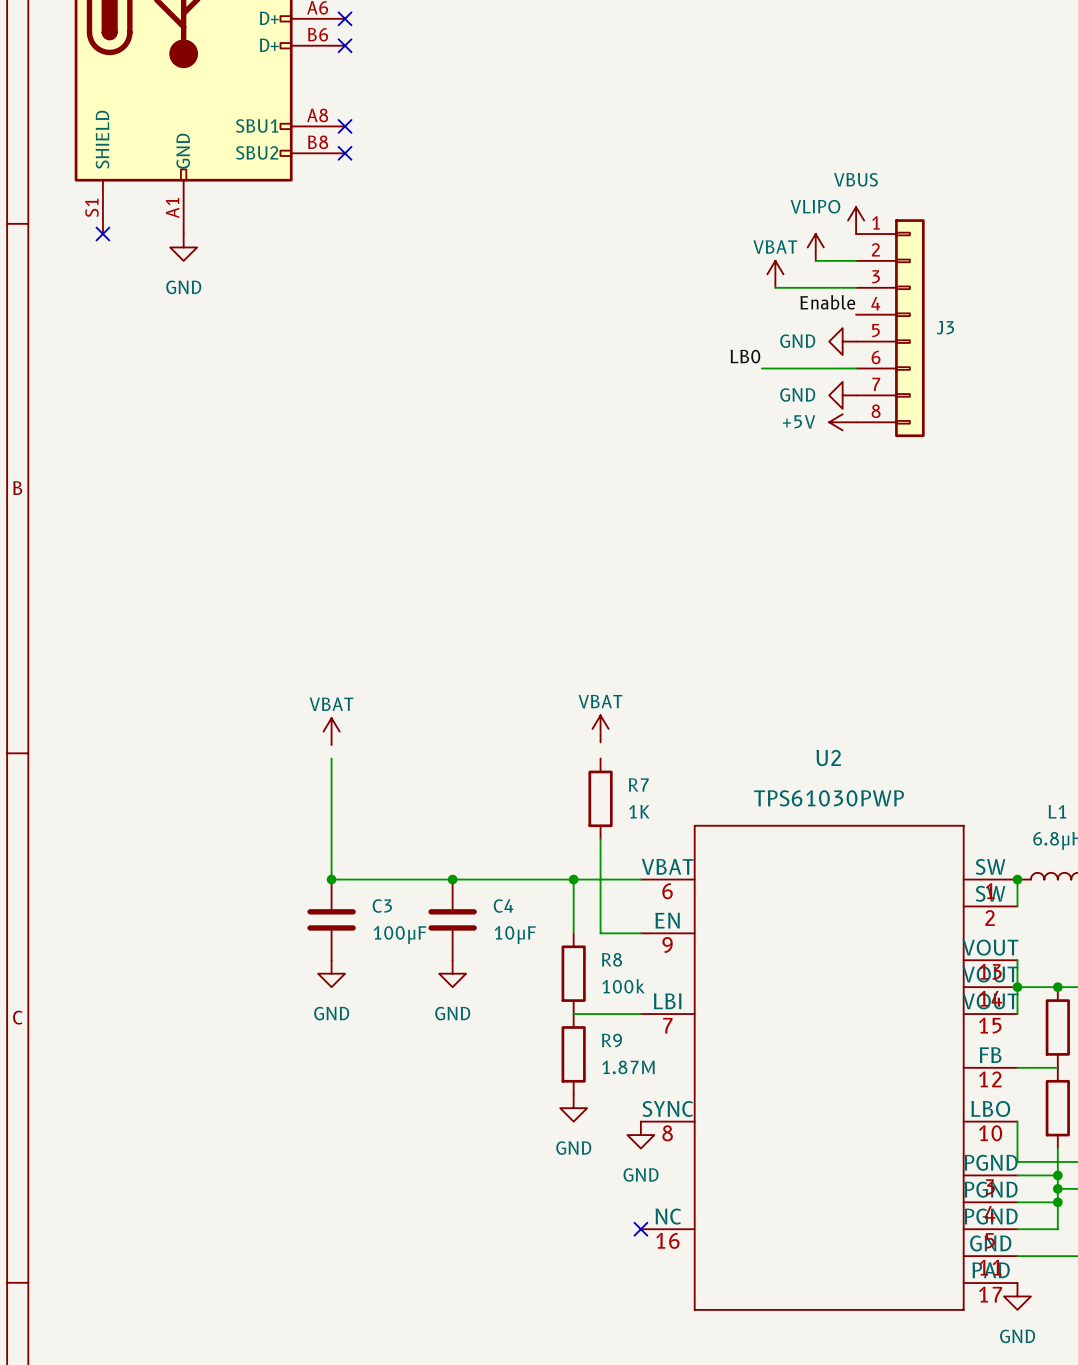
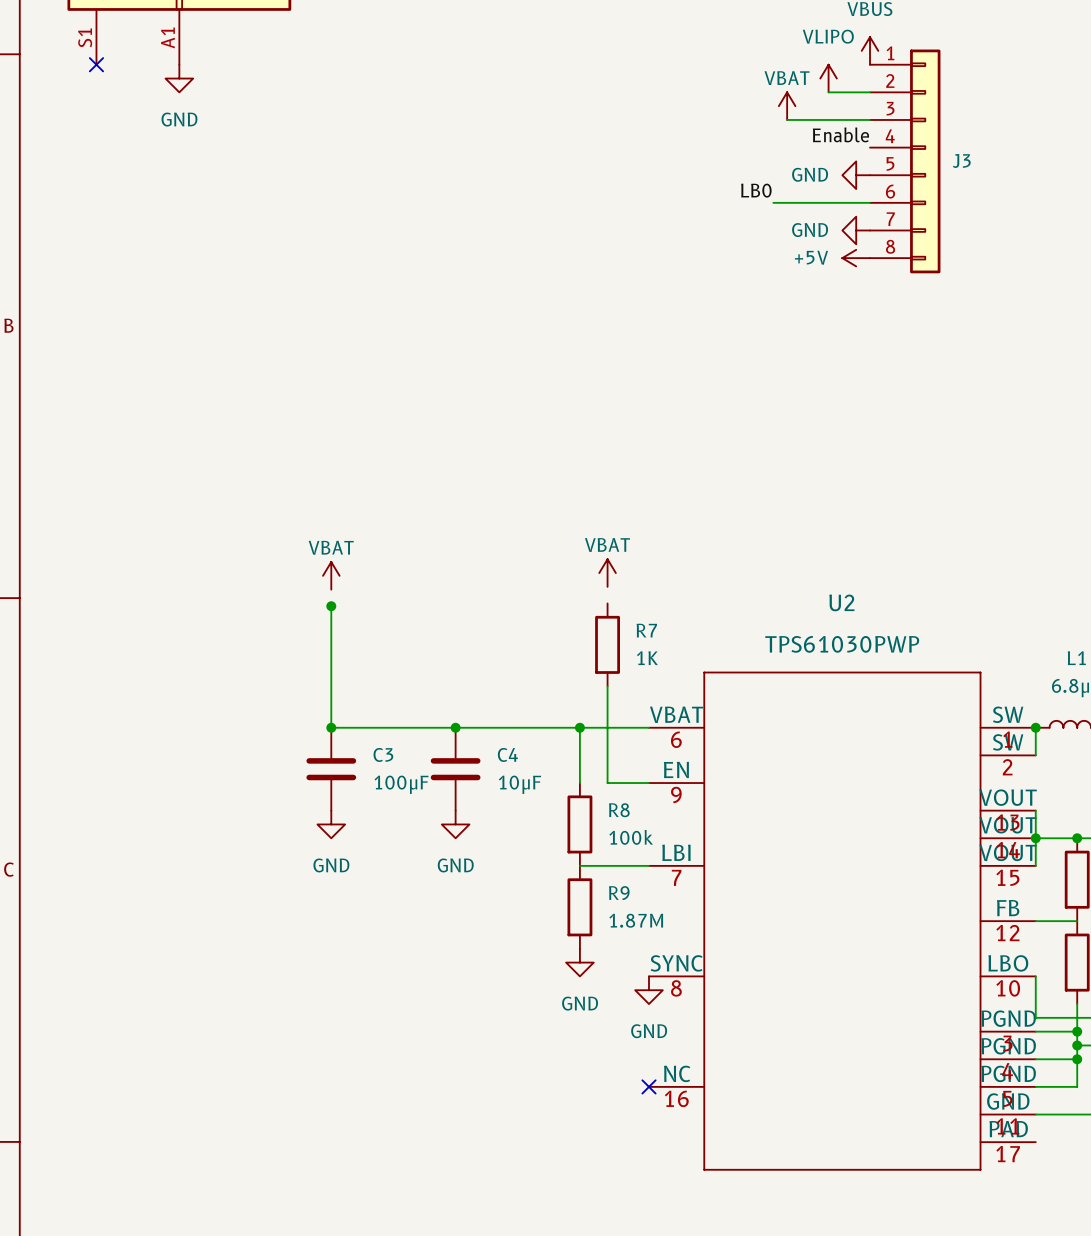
junction: none -> (331, 606)
power symbol: GND (1017, 1296) -> none

